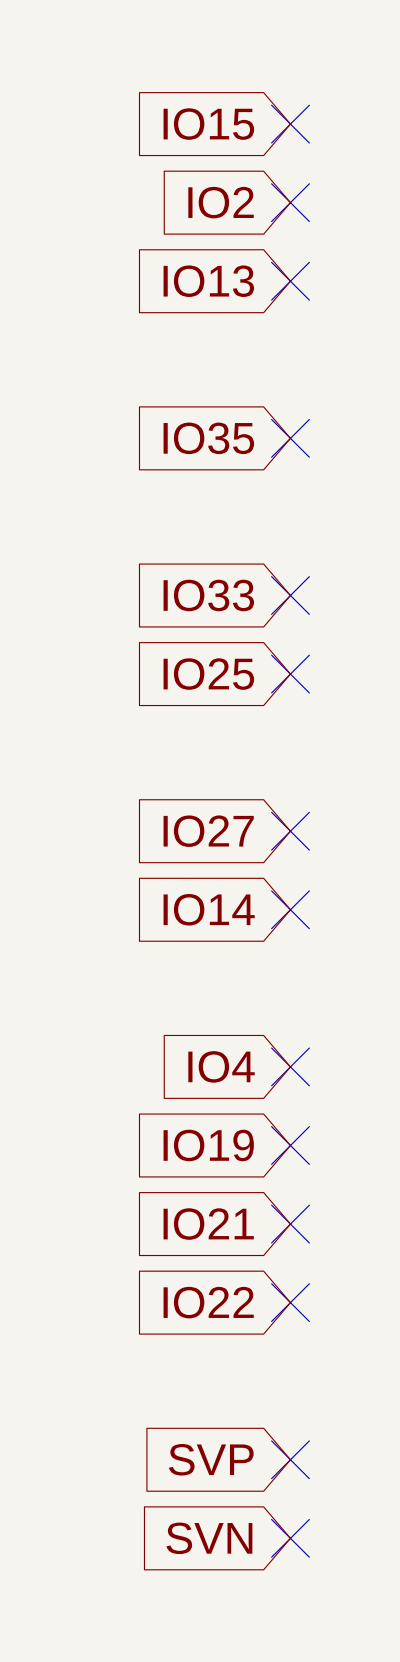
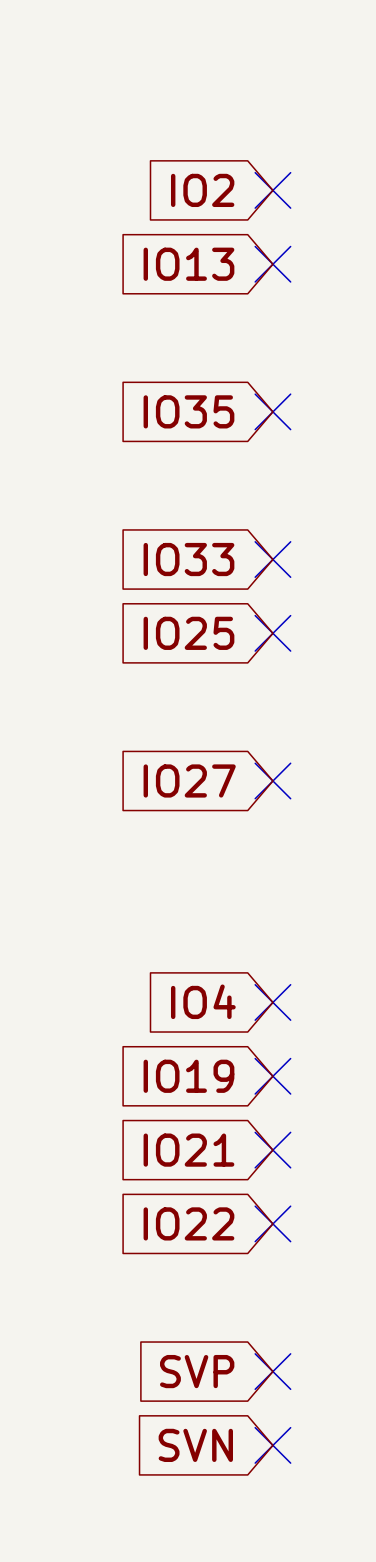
global label: IO15 (208, 124) -> none
no-connect mark: (290, 124) -> none
global label: IO14 (209, 909) -> none
no-connect mark: (290, 909) -> none

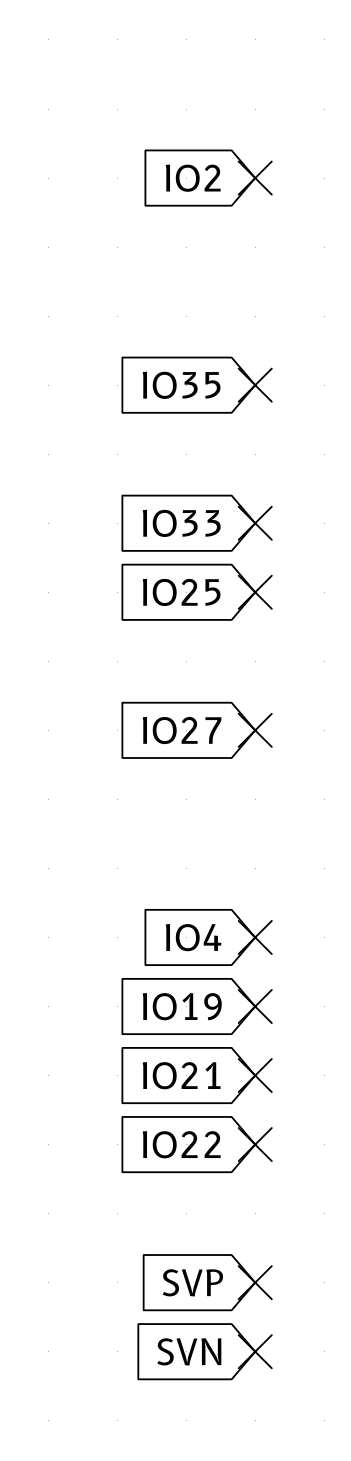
global label: IO13 (188, 264) -> none
no-connect mark: (272, 264) -> none

